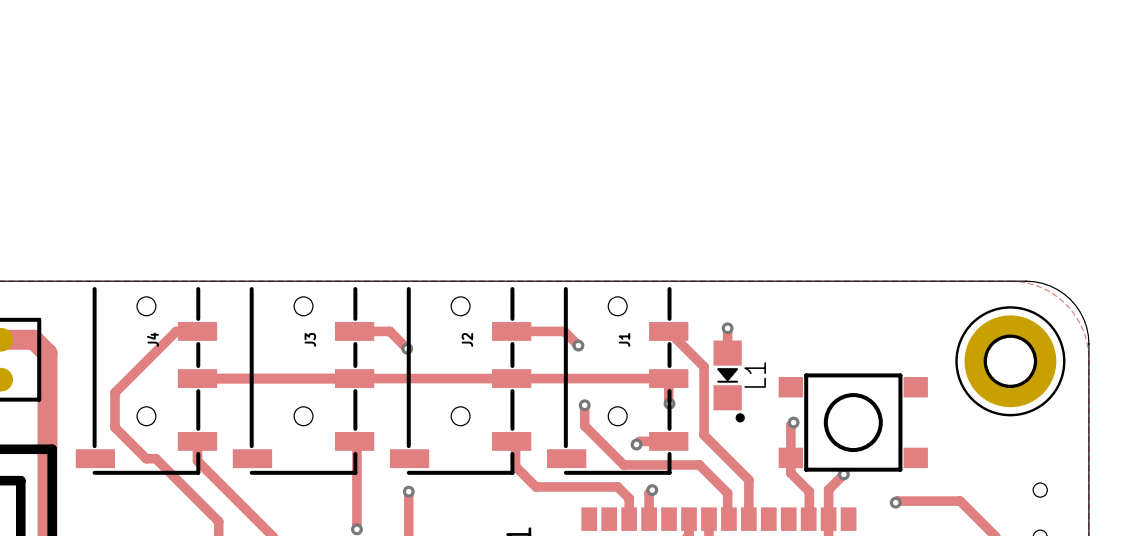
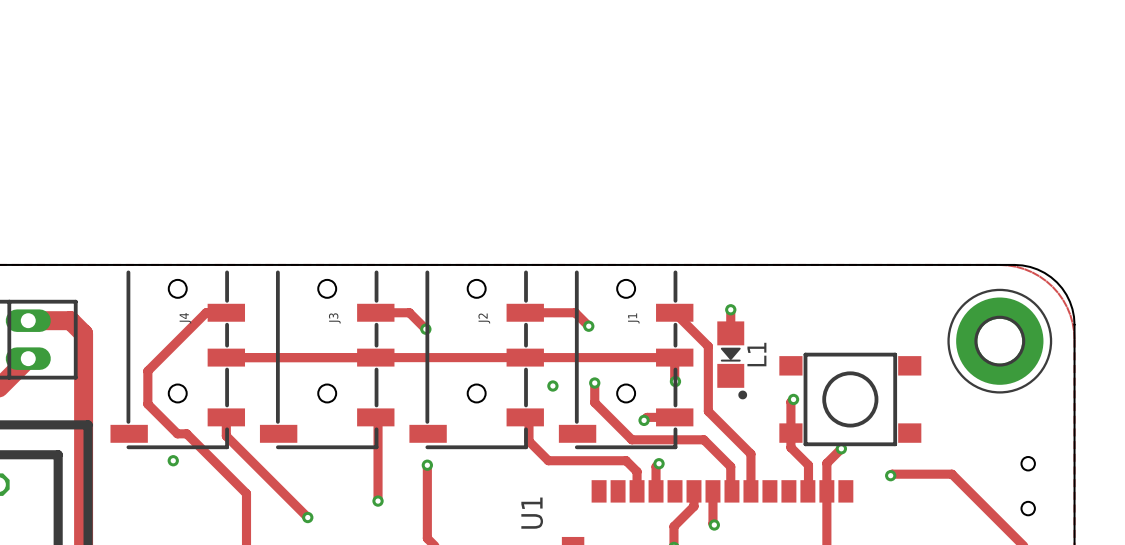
via: none -> (552, 386)
via: none -> (173, 460)

